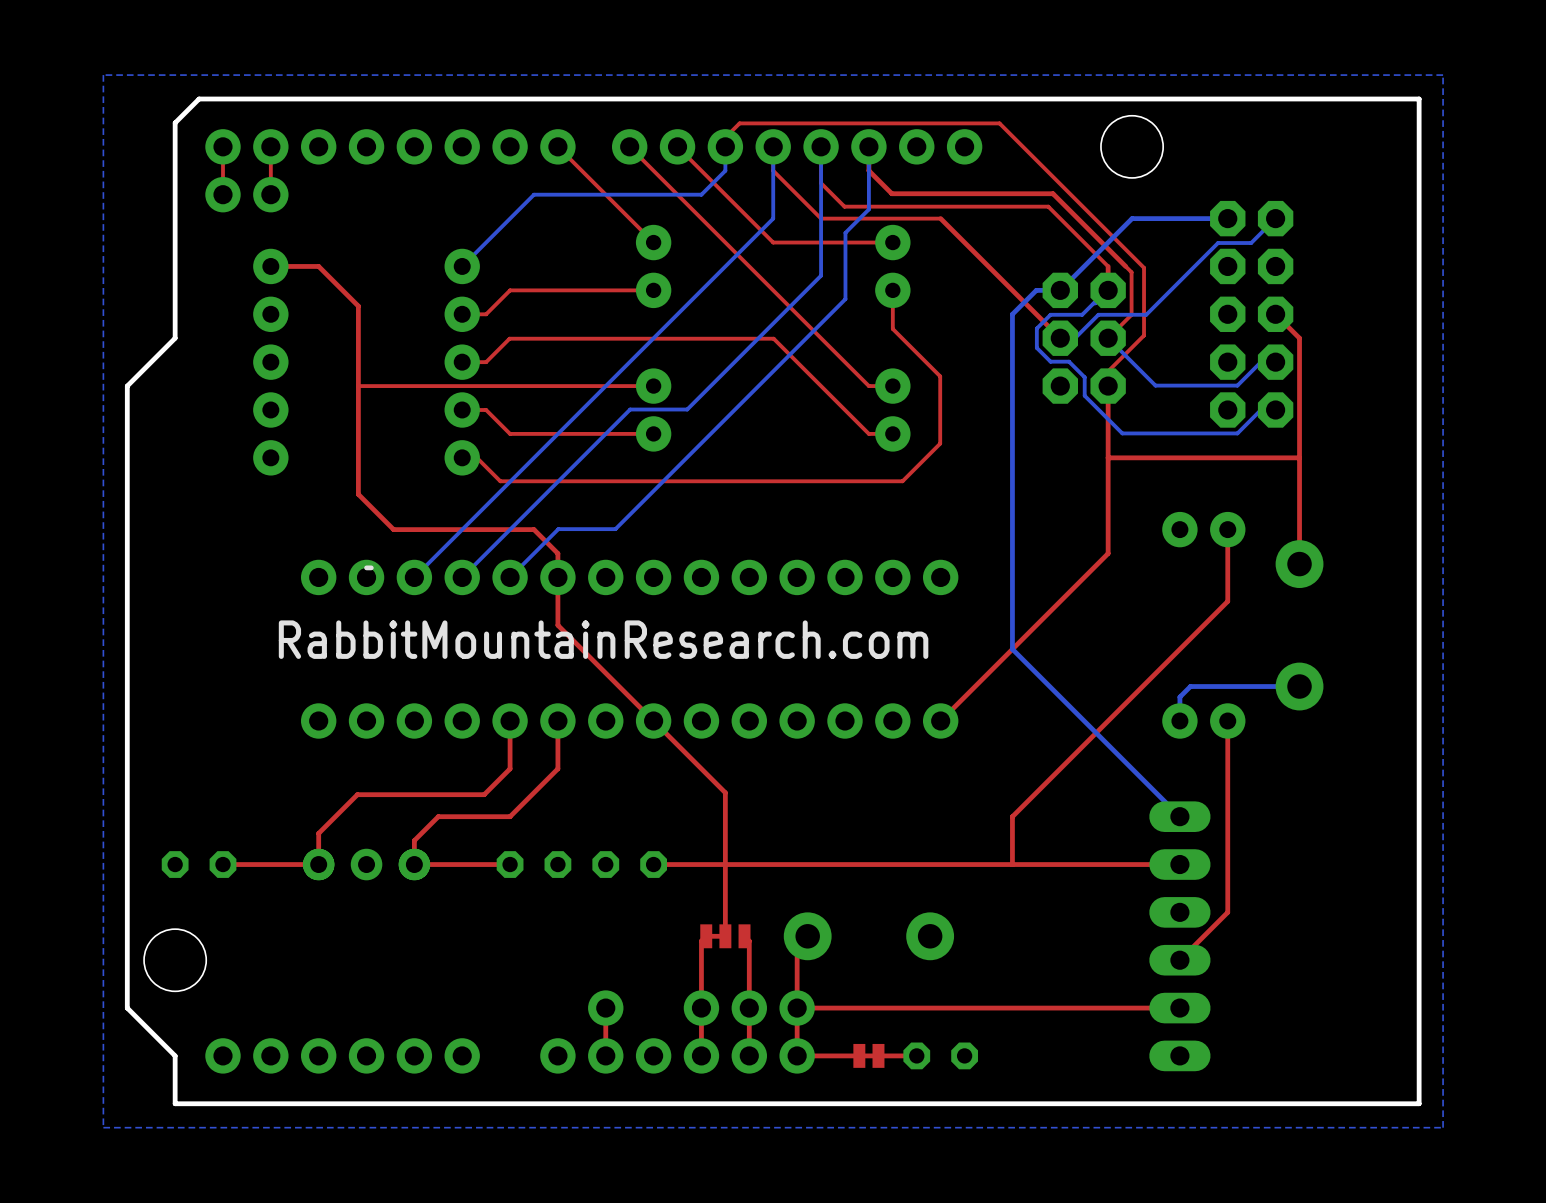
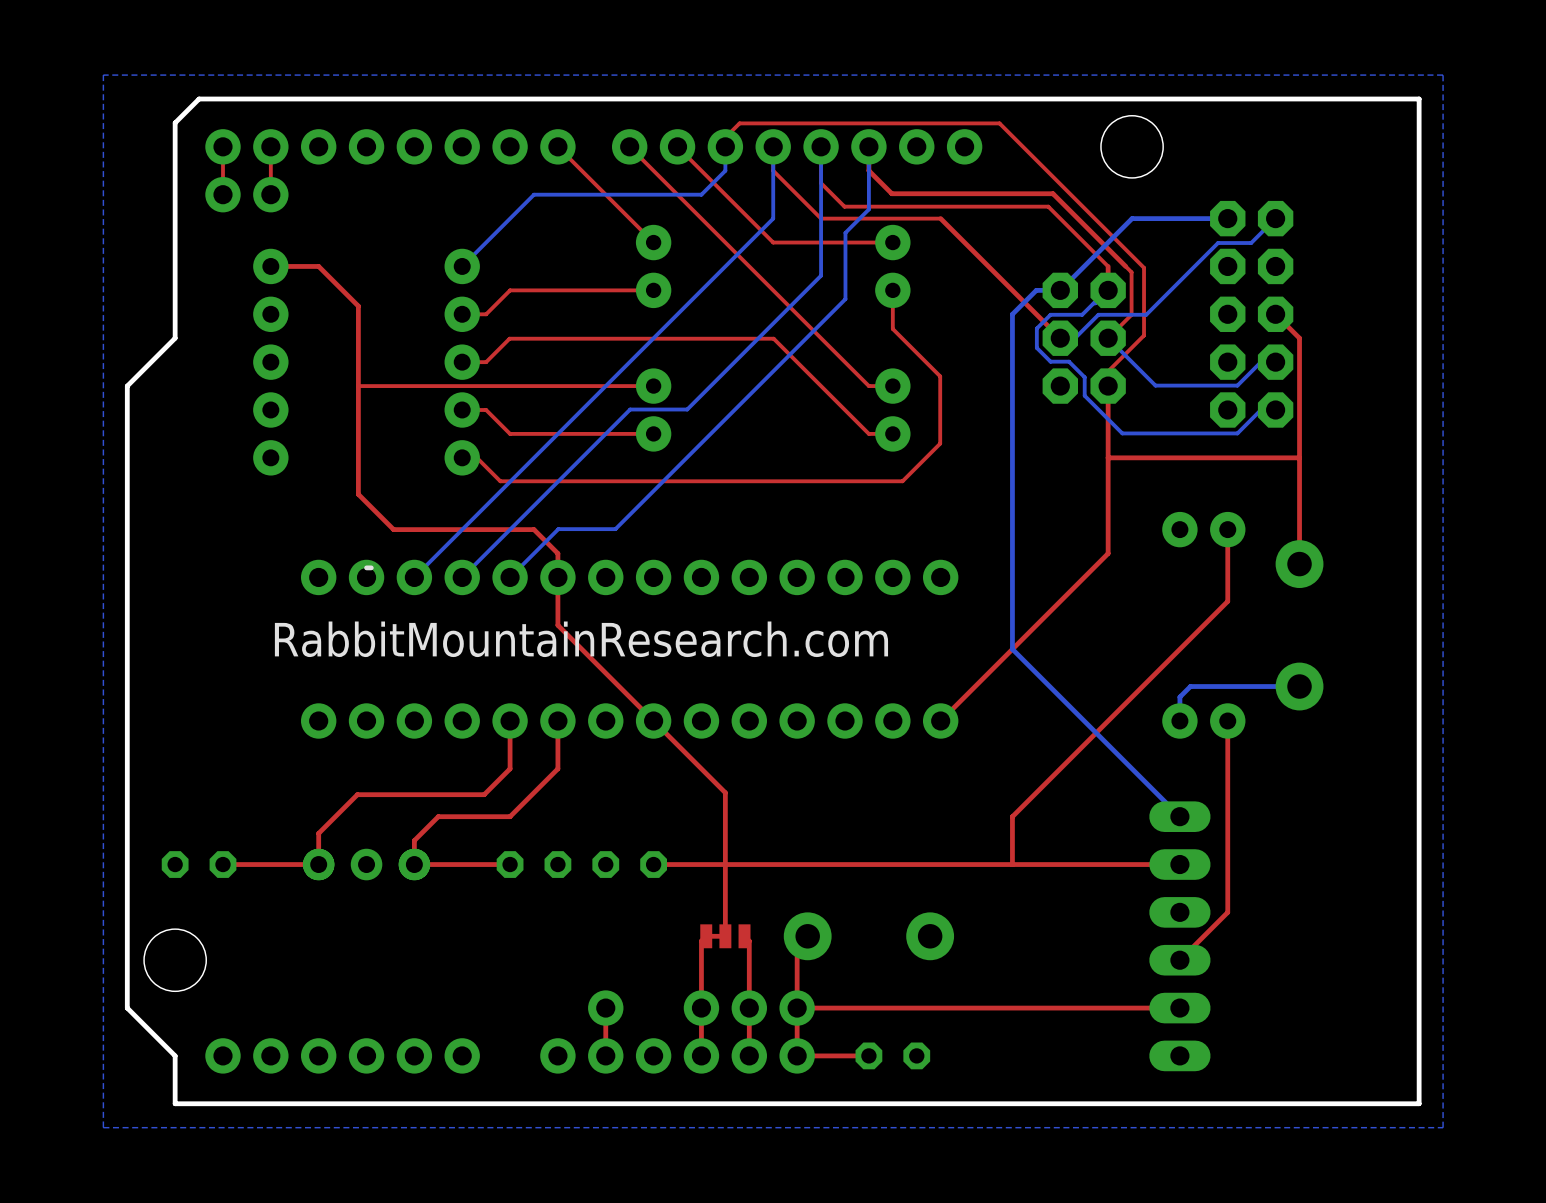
part: (868, 1055) -> none
top track: (916, 1055) (878, 1055) -> none
part position: (940, 1055) -> (892, 1055)

